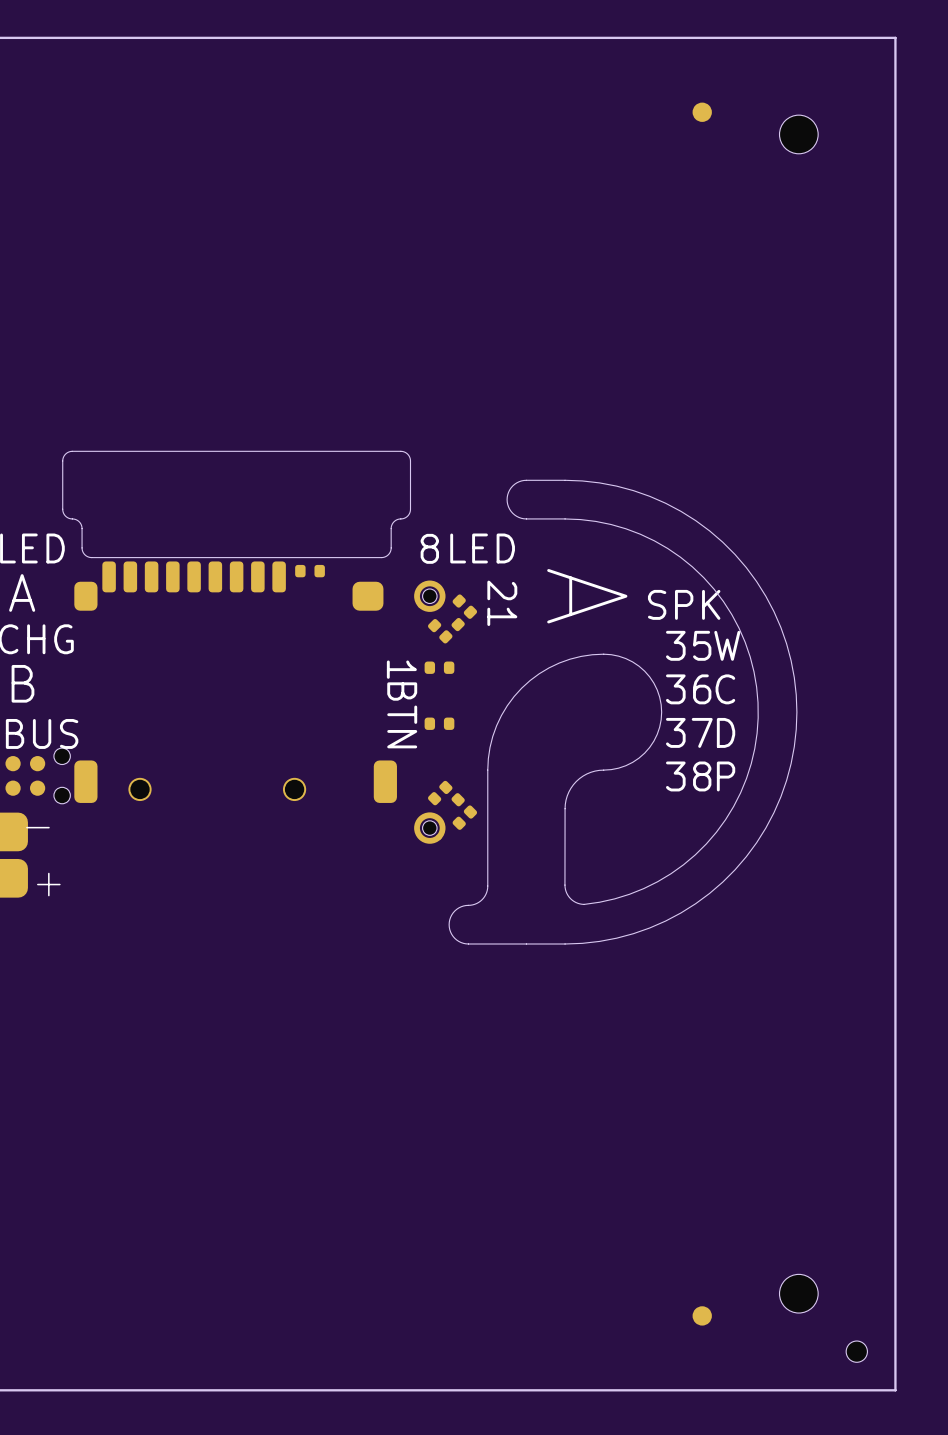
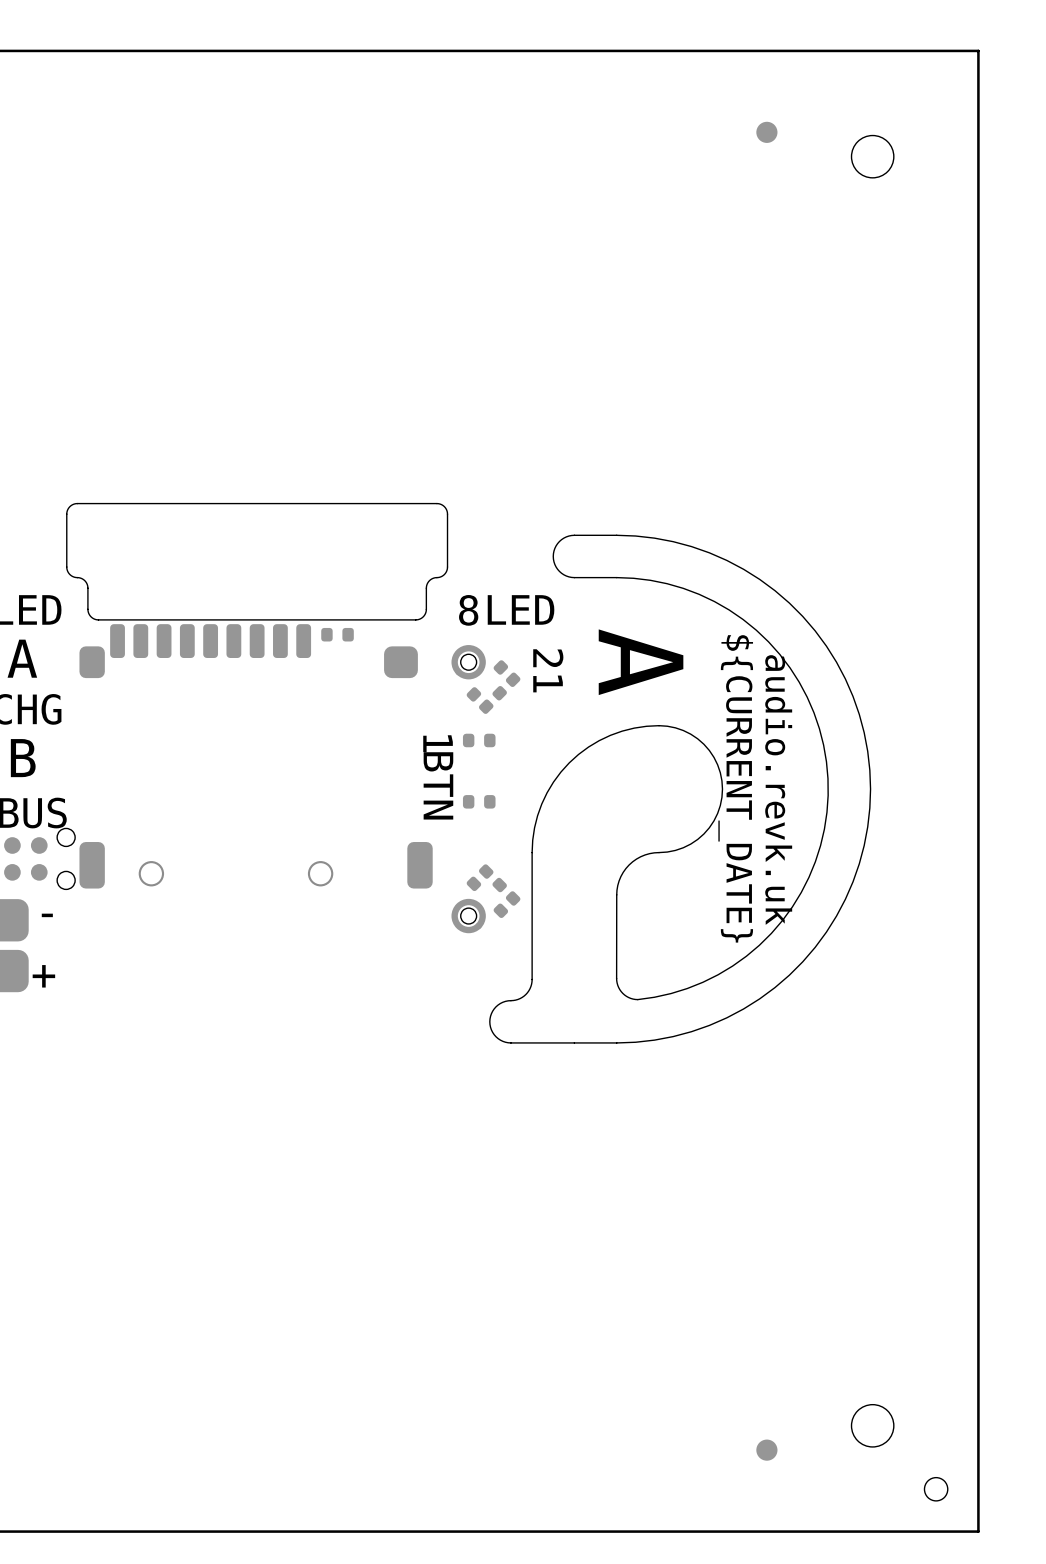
text: SPK (684, 604) -> none
text: 35 (688, 645) -> none
text: W (727, 645) -> none
text: 36 (688, 689) -> none
text: C (725, 689) -> none
text: none -> ${CURRENT_DATE} (735, 788)
text: none -> audio.revk.uk (778, 790)
text: 37 (689, 732) -> none
text: D (726, 732) -> none
text: 38 (688, 776) -> none
text: P (726, 776) -> none

